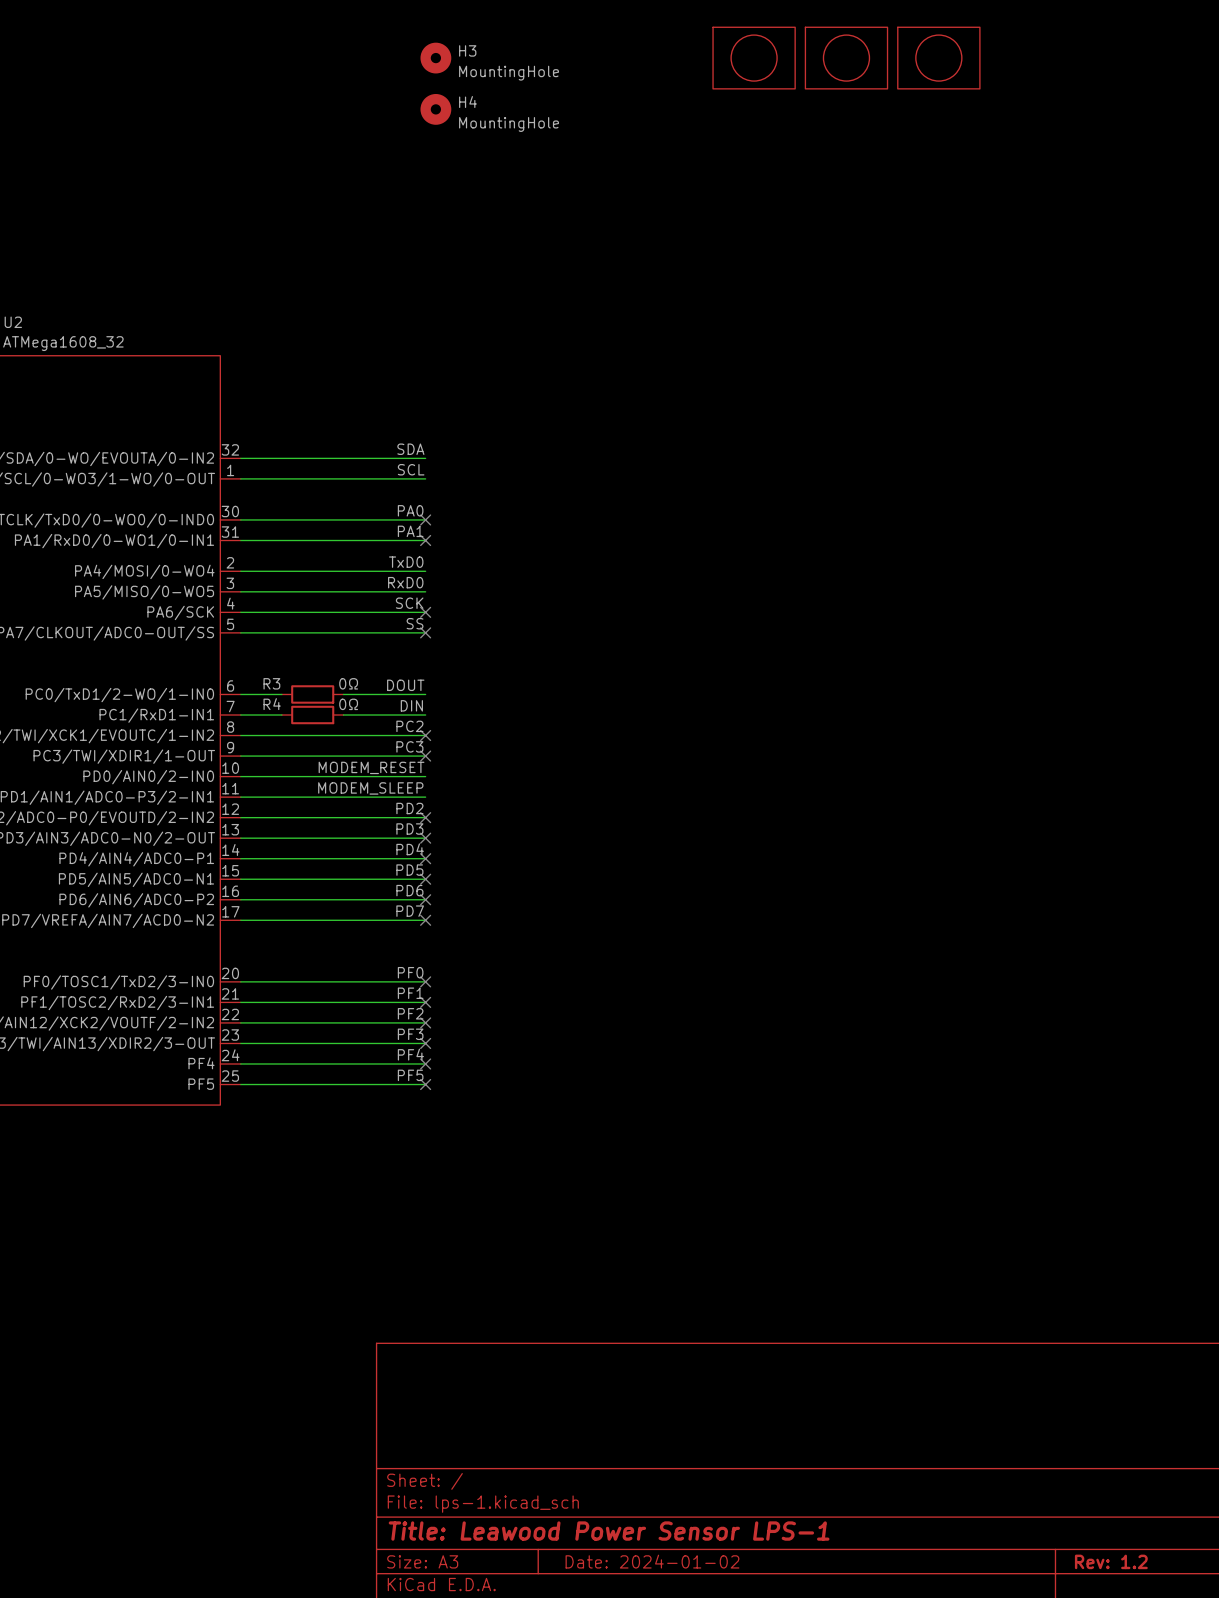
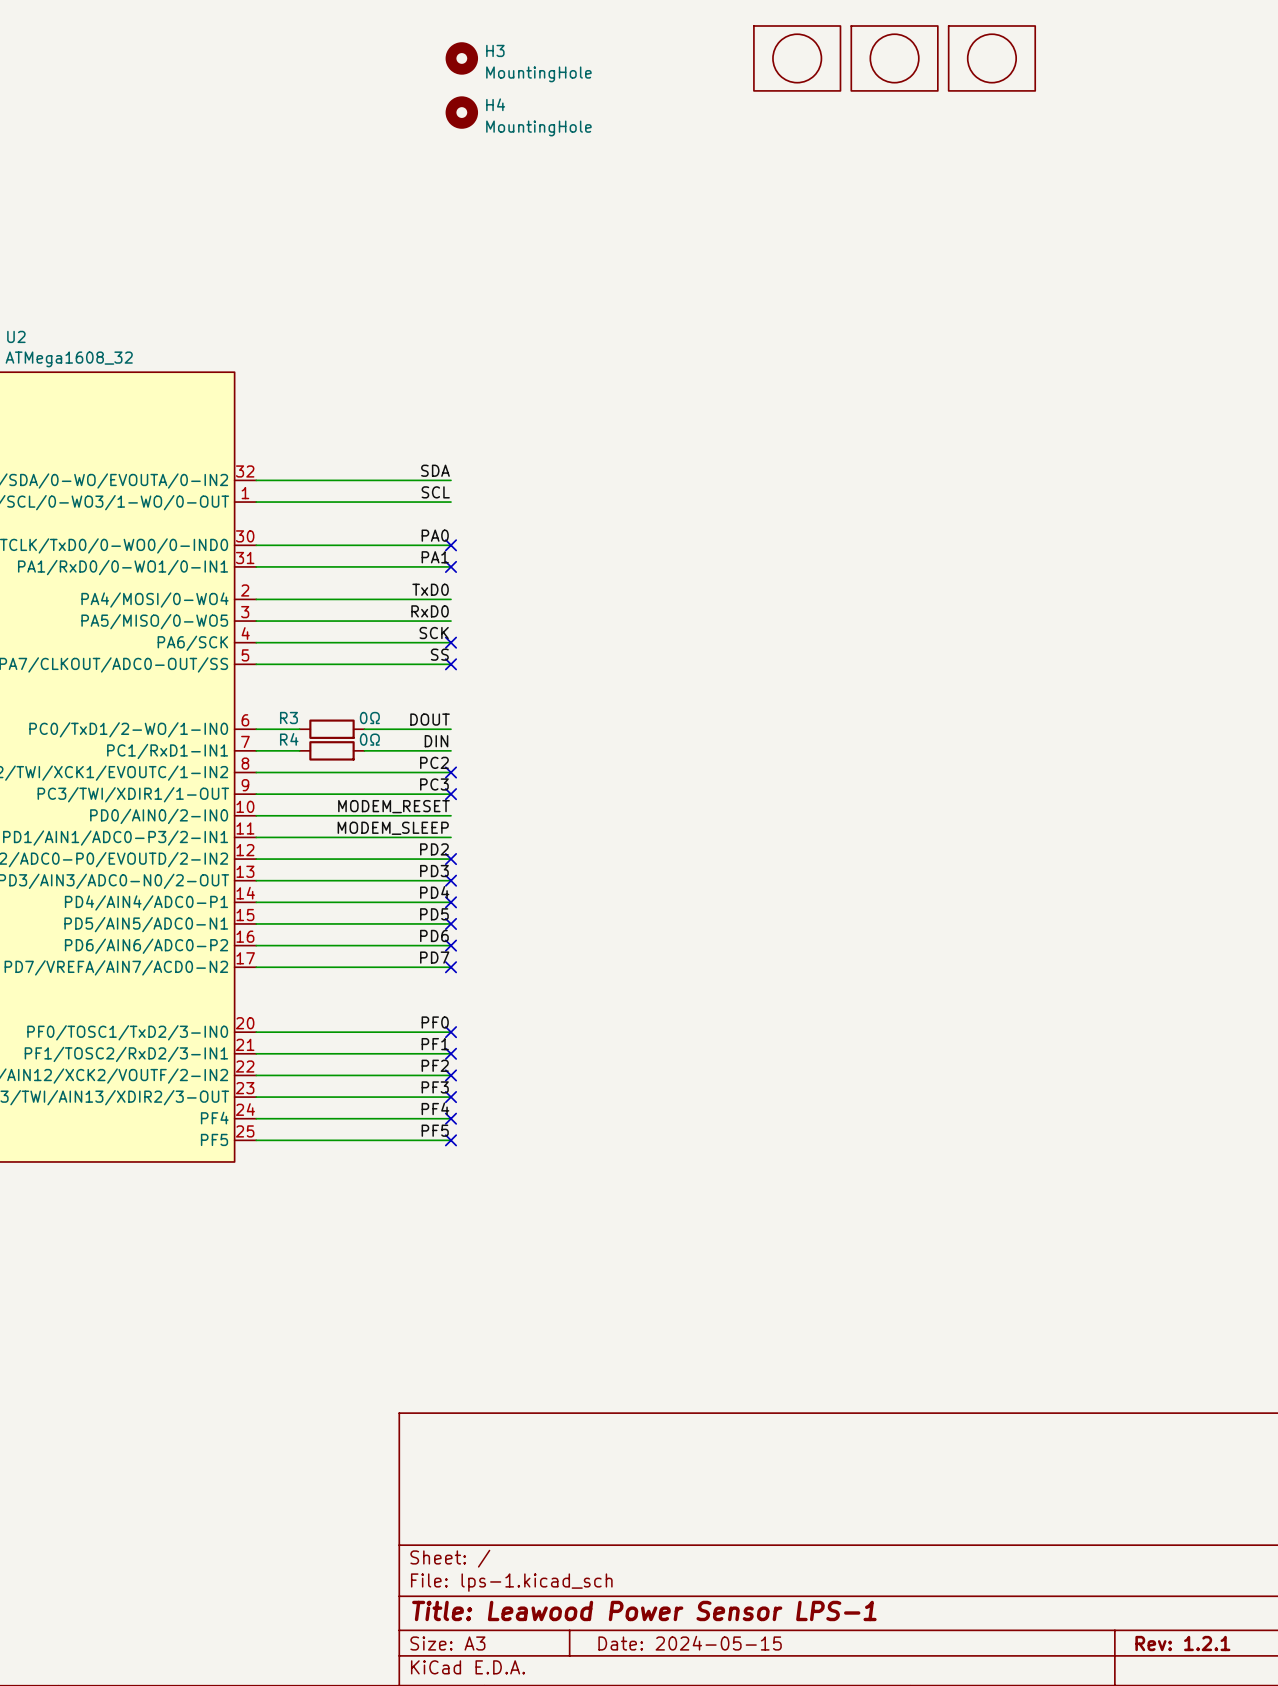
title block: Date: 2024-01-02 (652, 1561) -> Date: 2024-05-15 (690, 1643)
title block: Rev: 1.2 (1111, 1561) -> Rev: 1.2.1 (1182, 1643)

